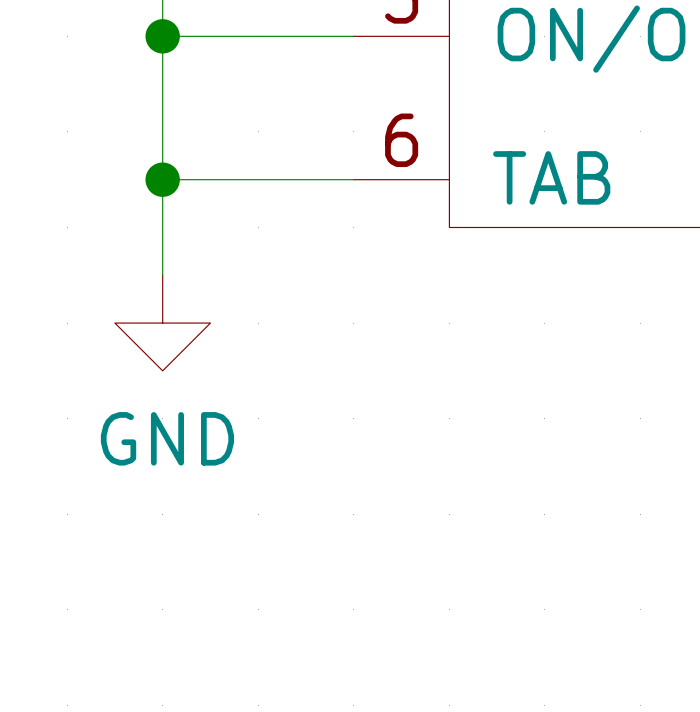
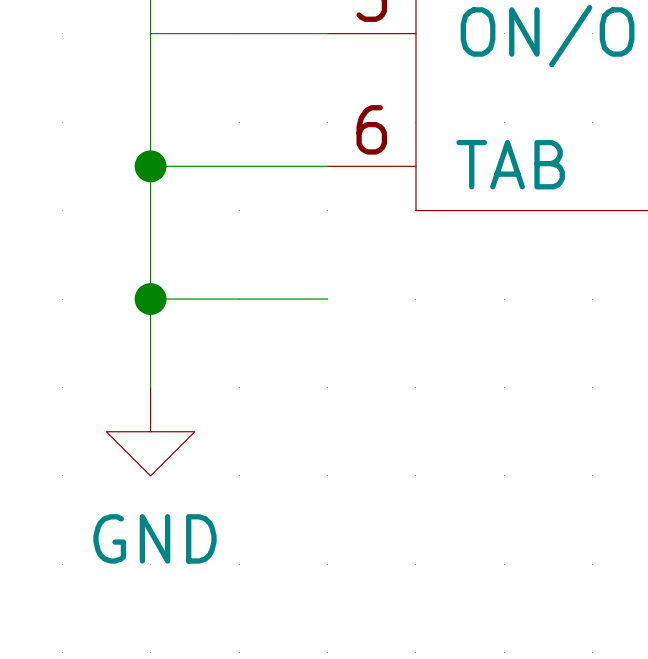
junction: (162, 36) -> none
wire: none -> (150, 254) (150, 387)
wire: none -> (150, 299) (327, 299)
power symbol position: GND (162, 323) -> GND (150, 431)
junction: none -> (150, 299)

